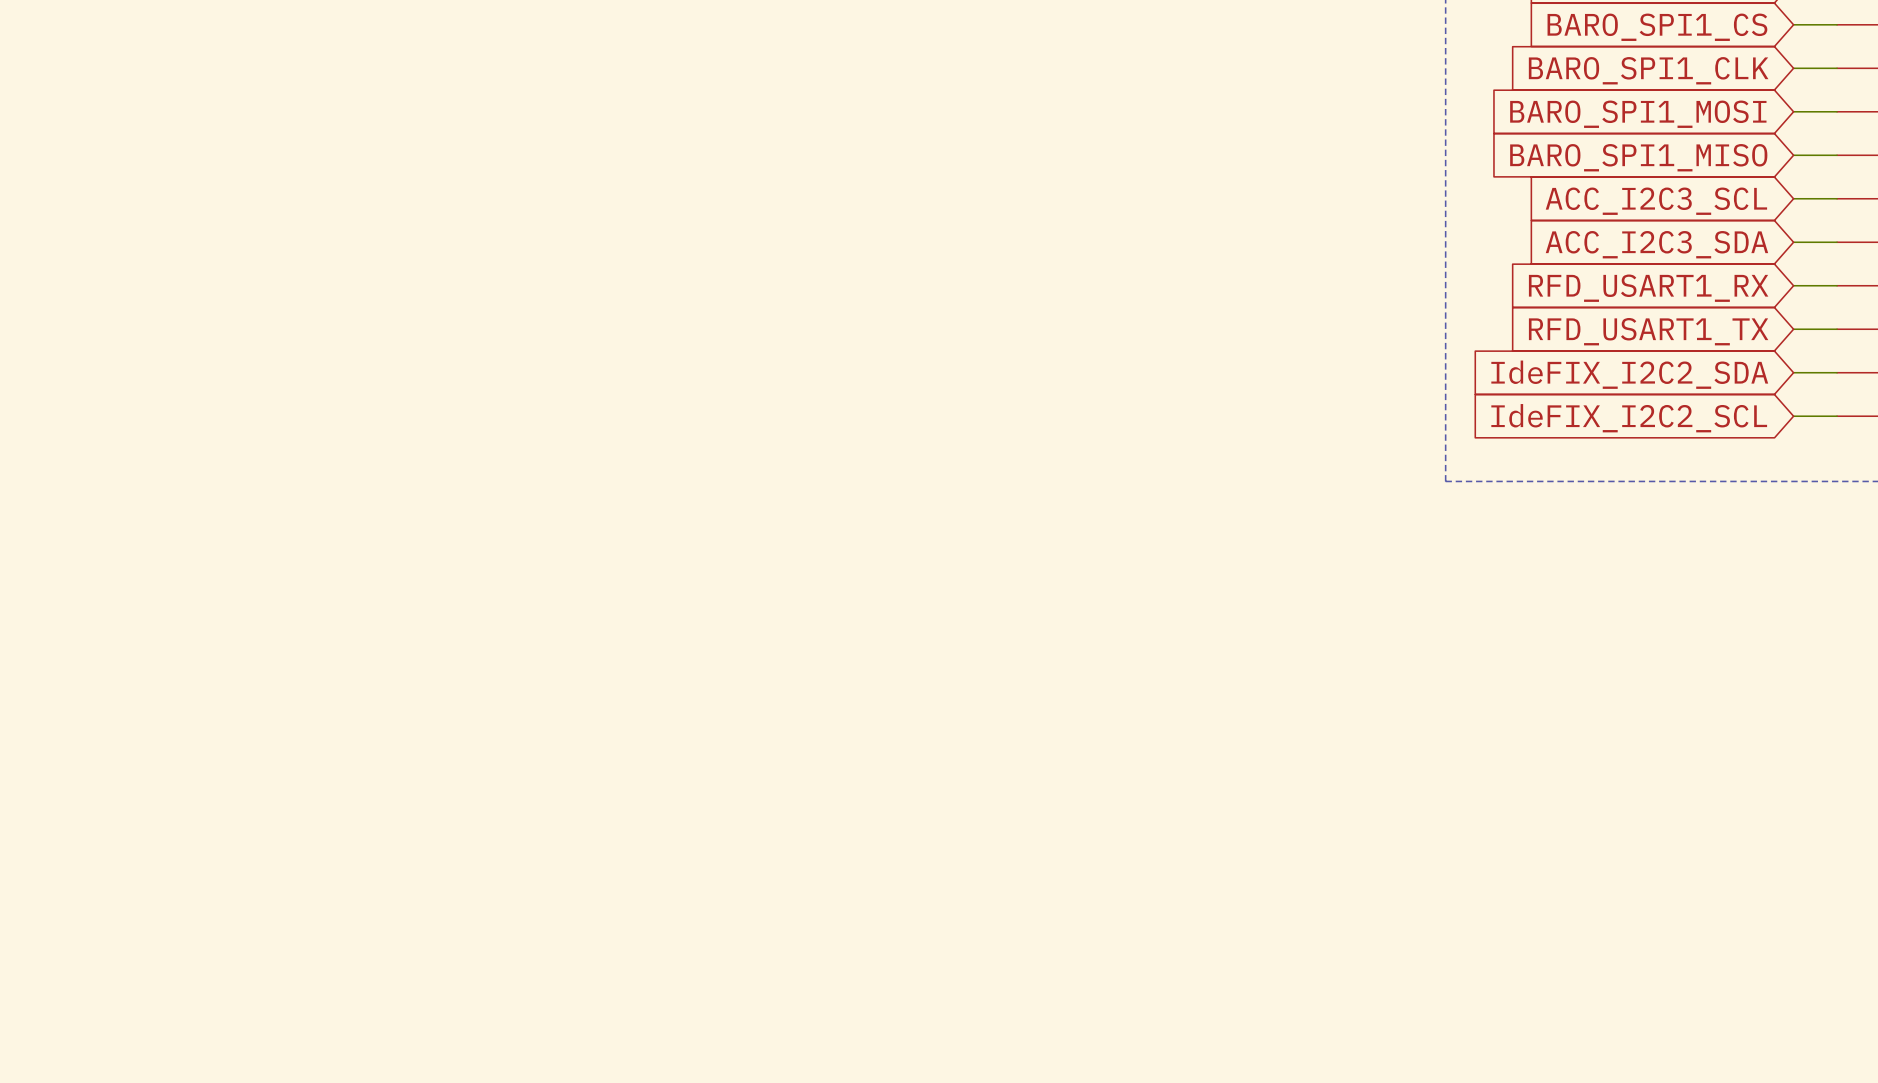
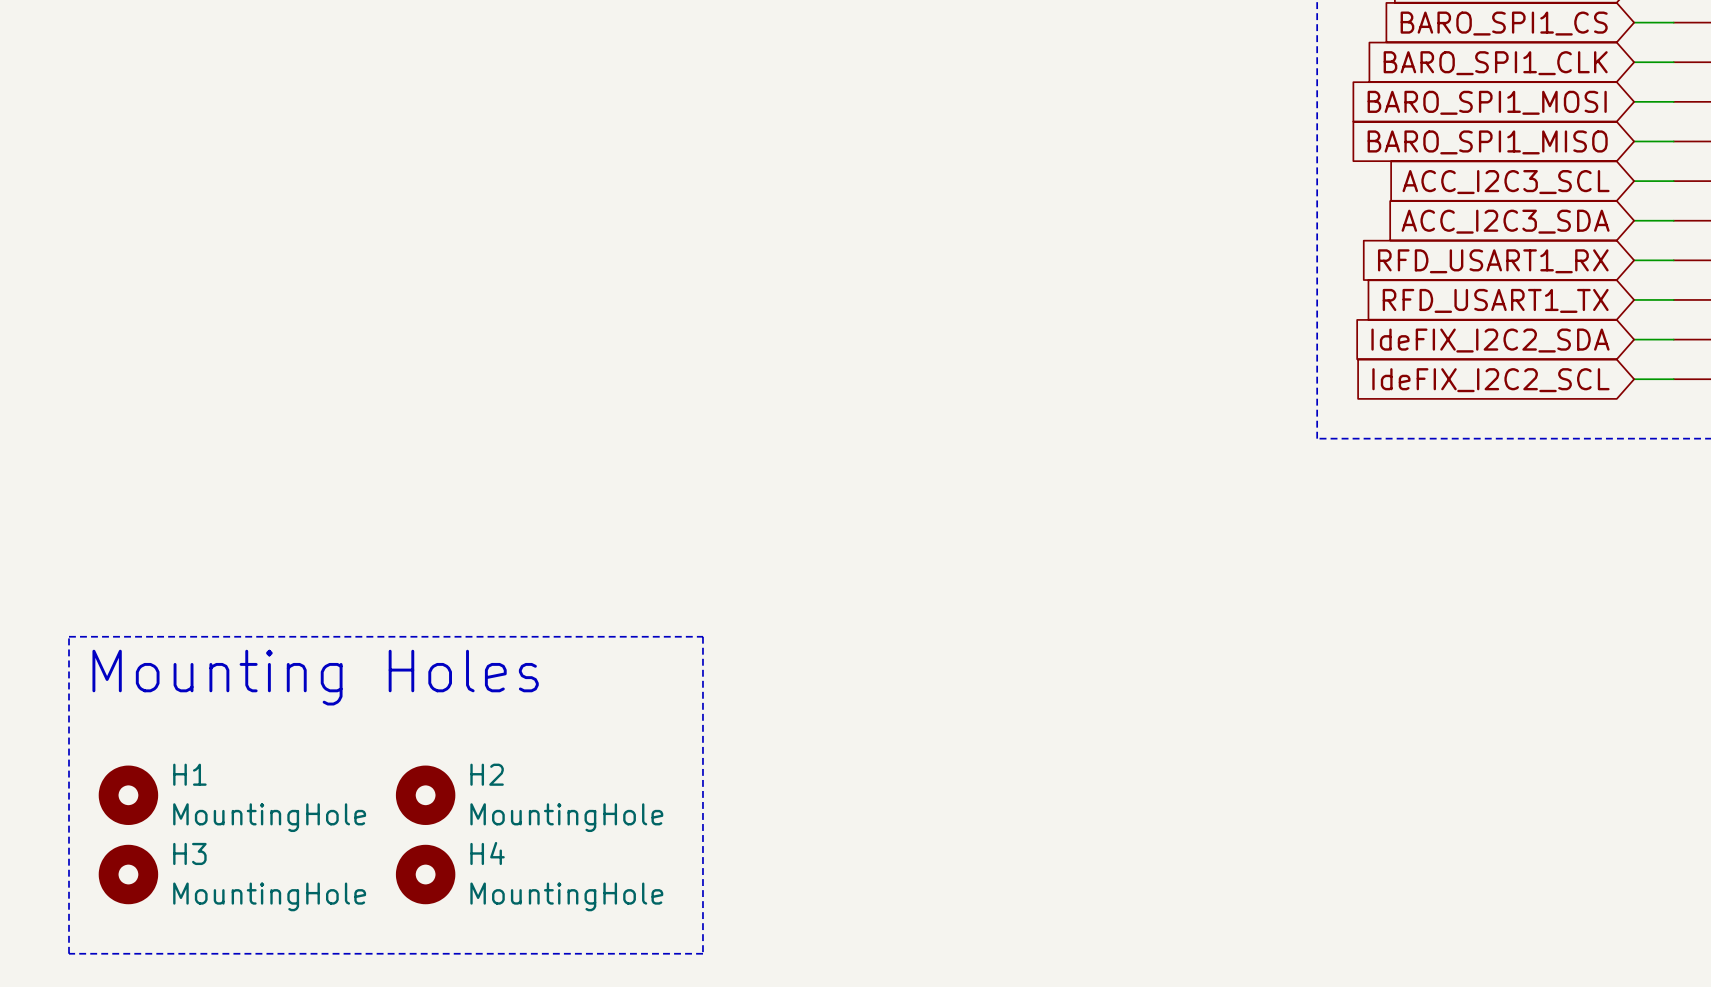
line: none -> (69, 636) (702, 636) (702, 953) (69, 953) (69, 636)
text: none -> Mounting Holes (315, 677)
H1: none -> MountingHole (128, 795)
H2: none -> MountingHole (425, 795)
H3: none -> MountingHole (128, 874)
H4: none -> MountingHole (425, 874)

